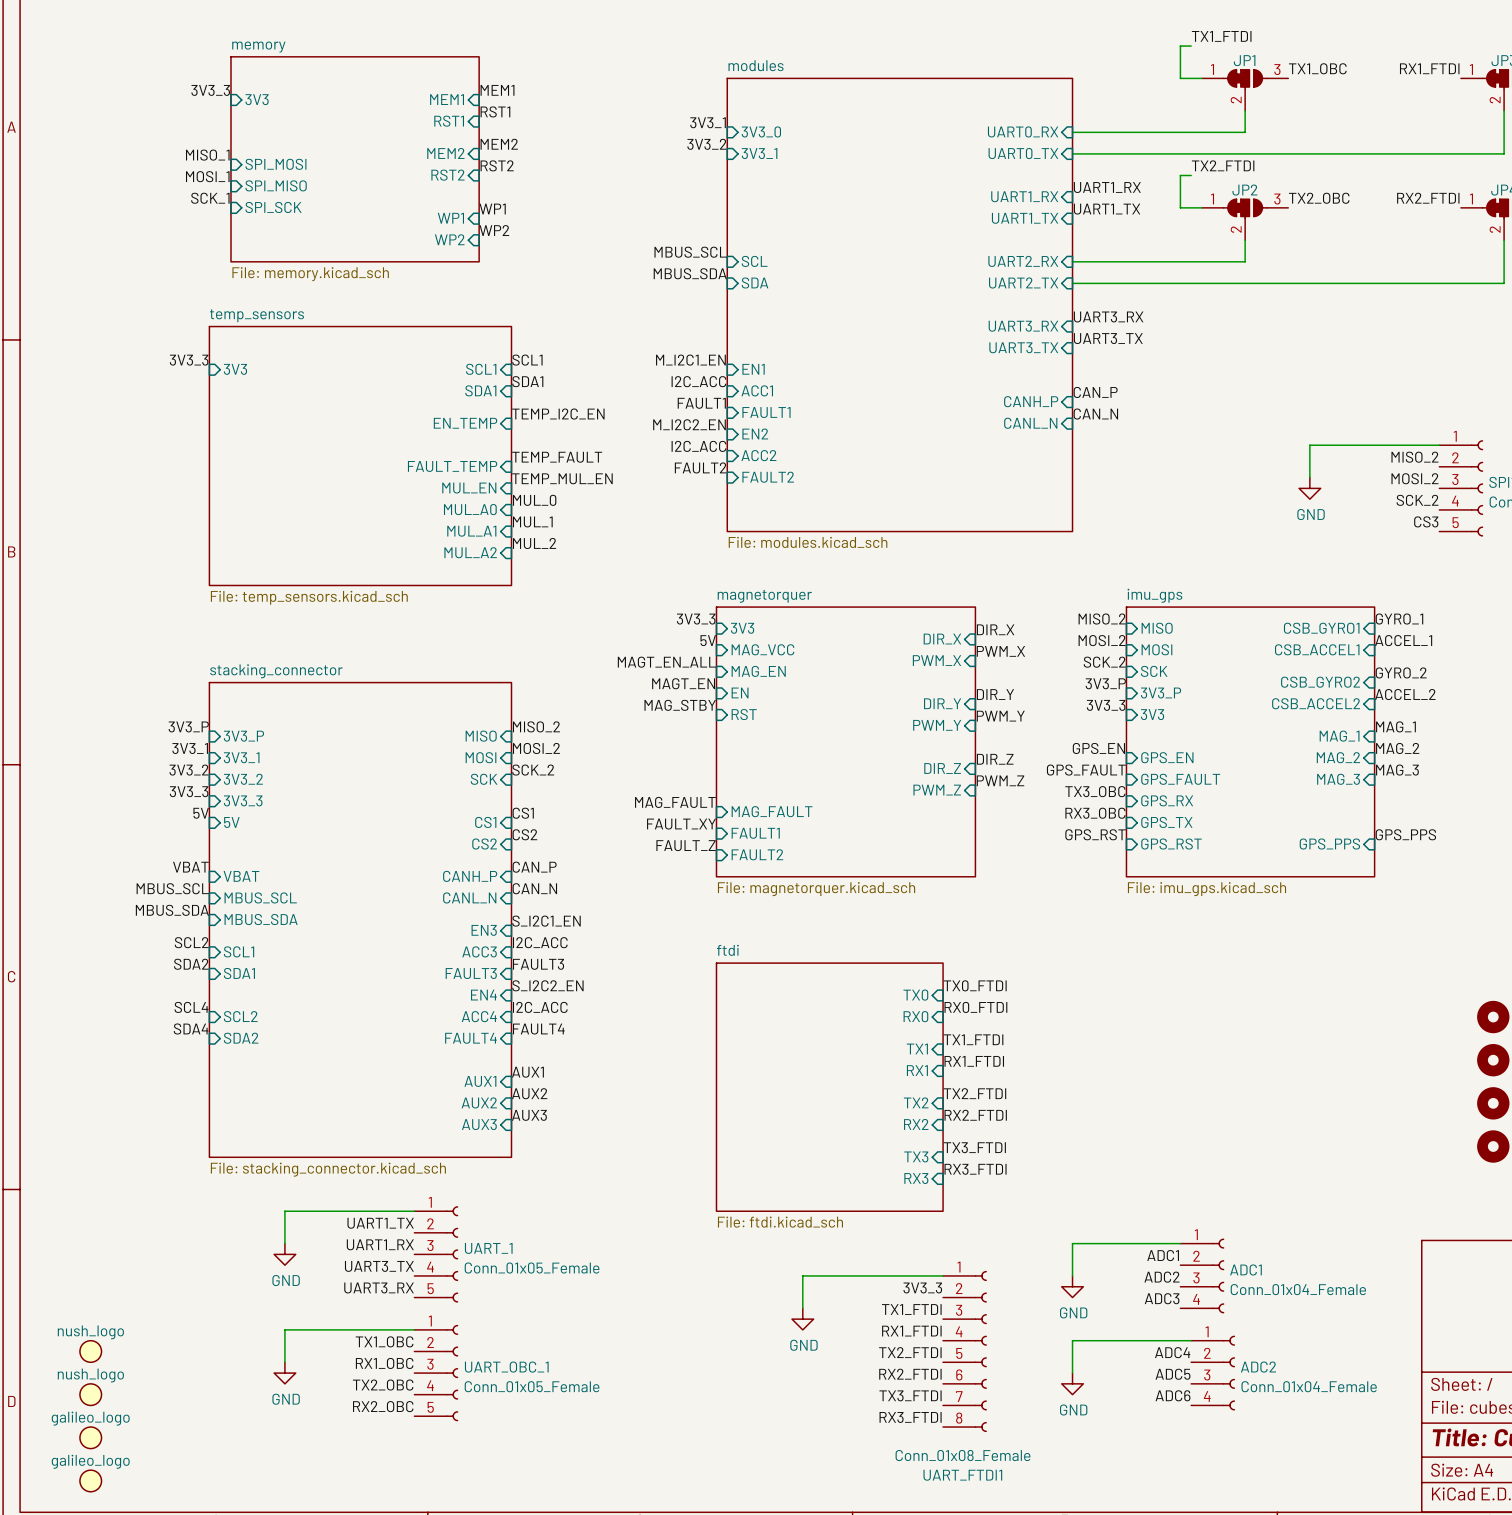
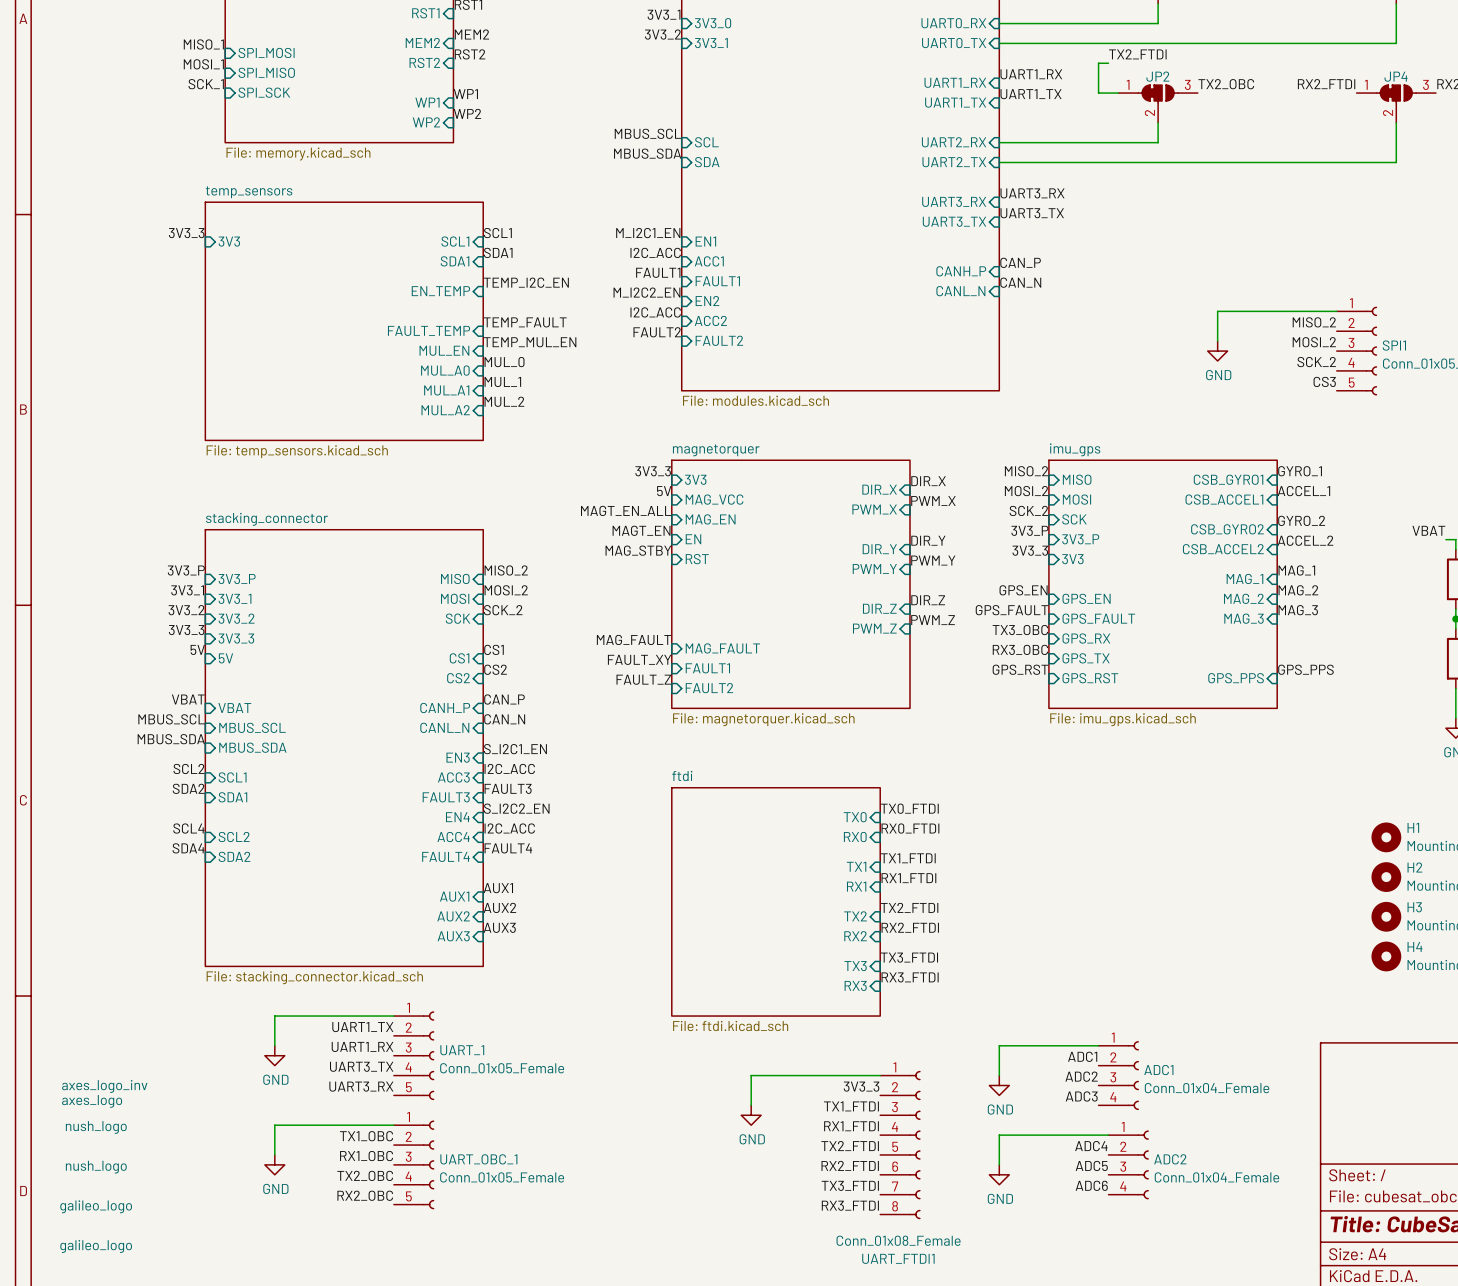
part: none -> axes_logo_inv (104, 1086)
part: none -> axes_logo (92, 1101)
part: nush_logo (90, 1351) -> none
part: nush_logo (90, 1394) -> none
part: galileo_logo (90, 1437) -> none
part: galileo_logo (90, 1480) -> none

